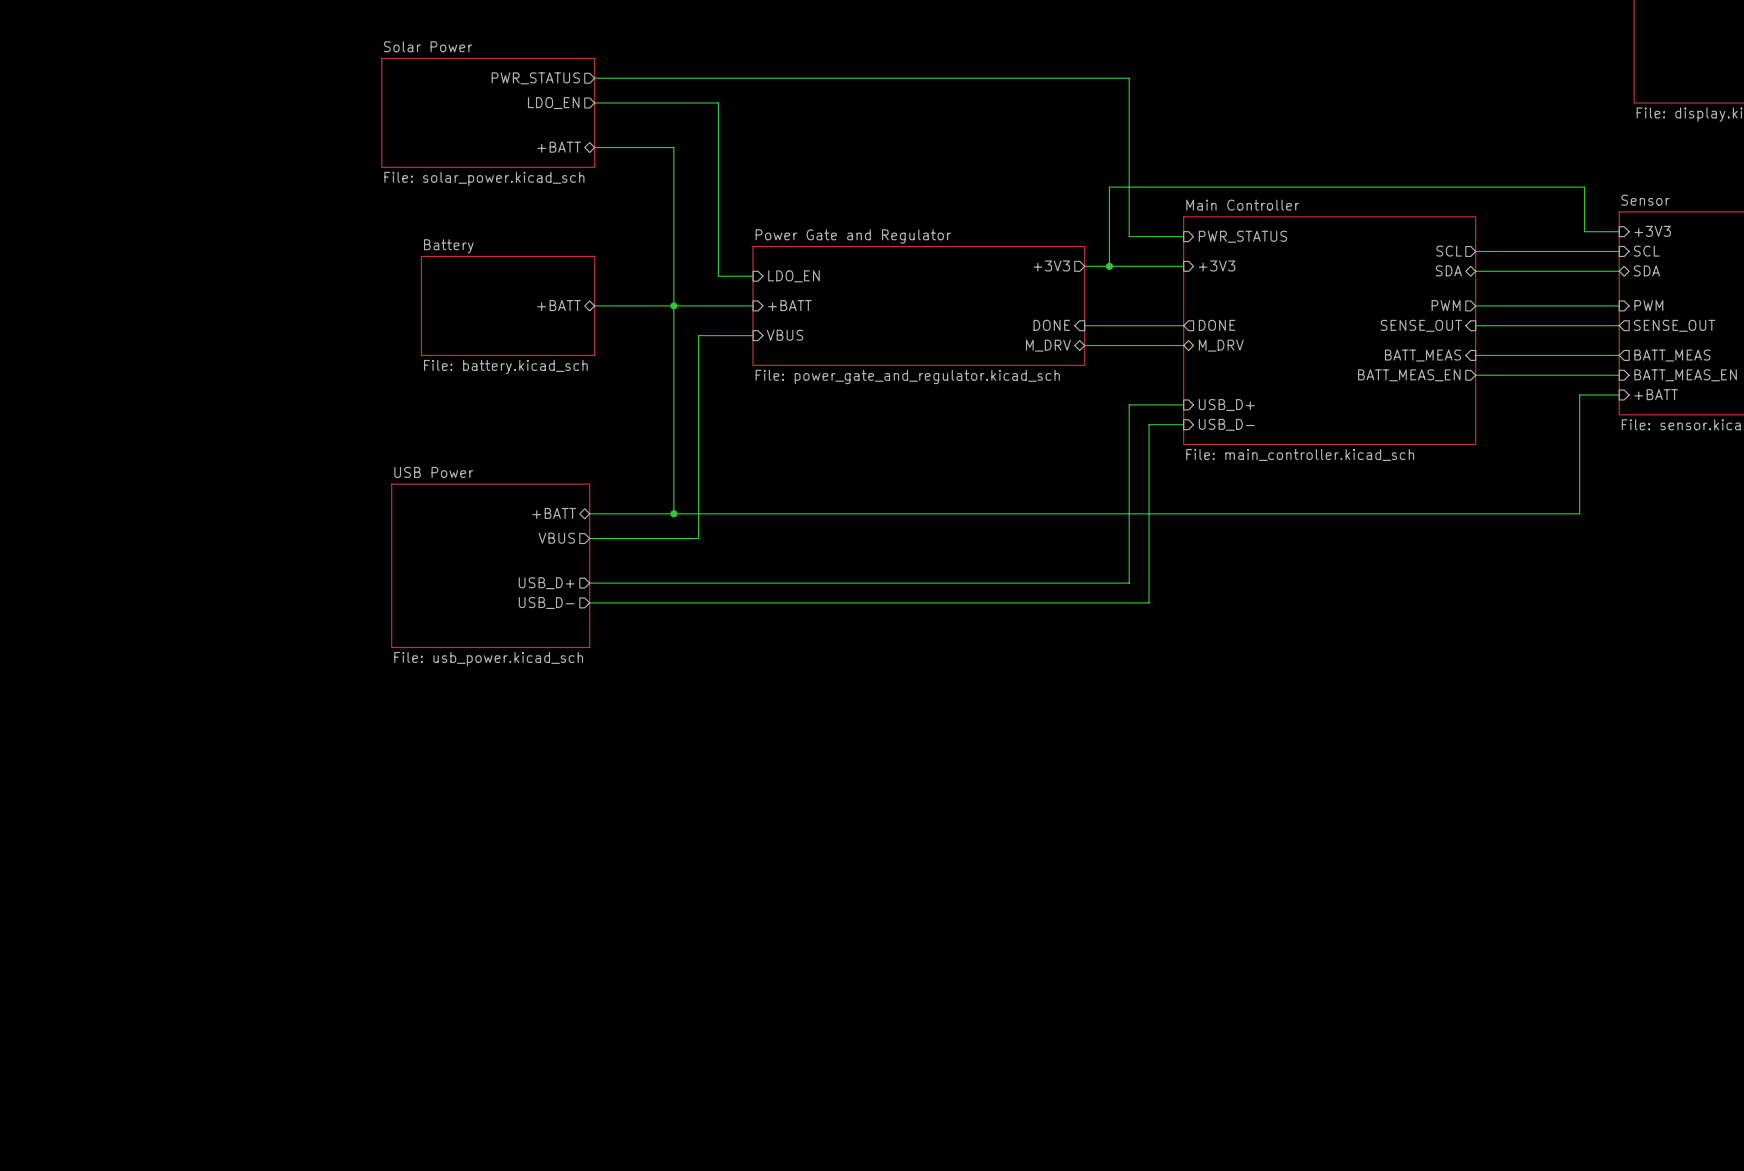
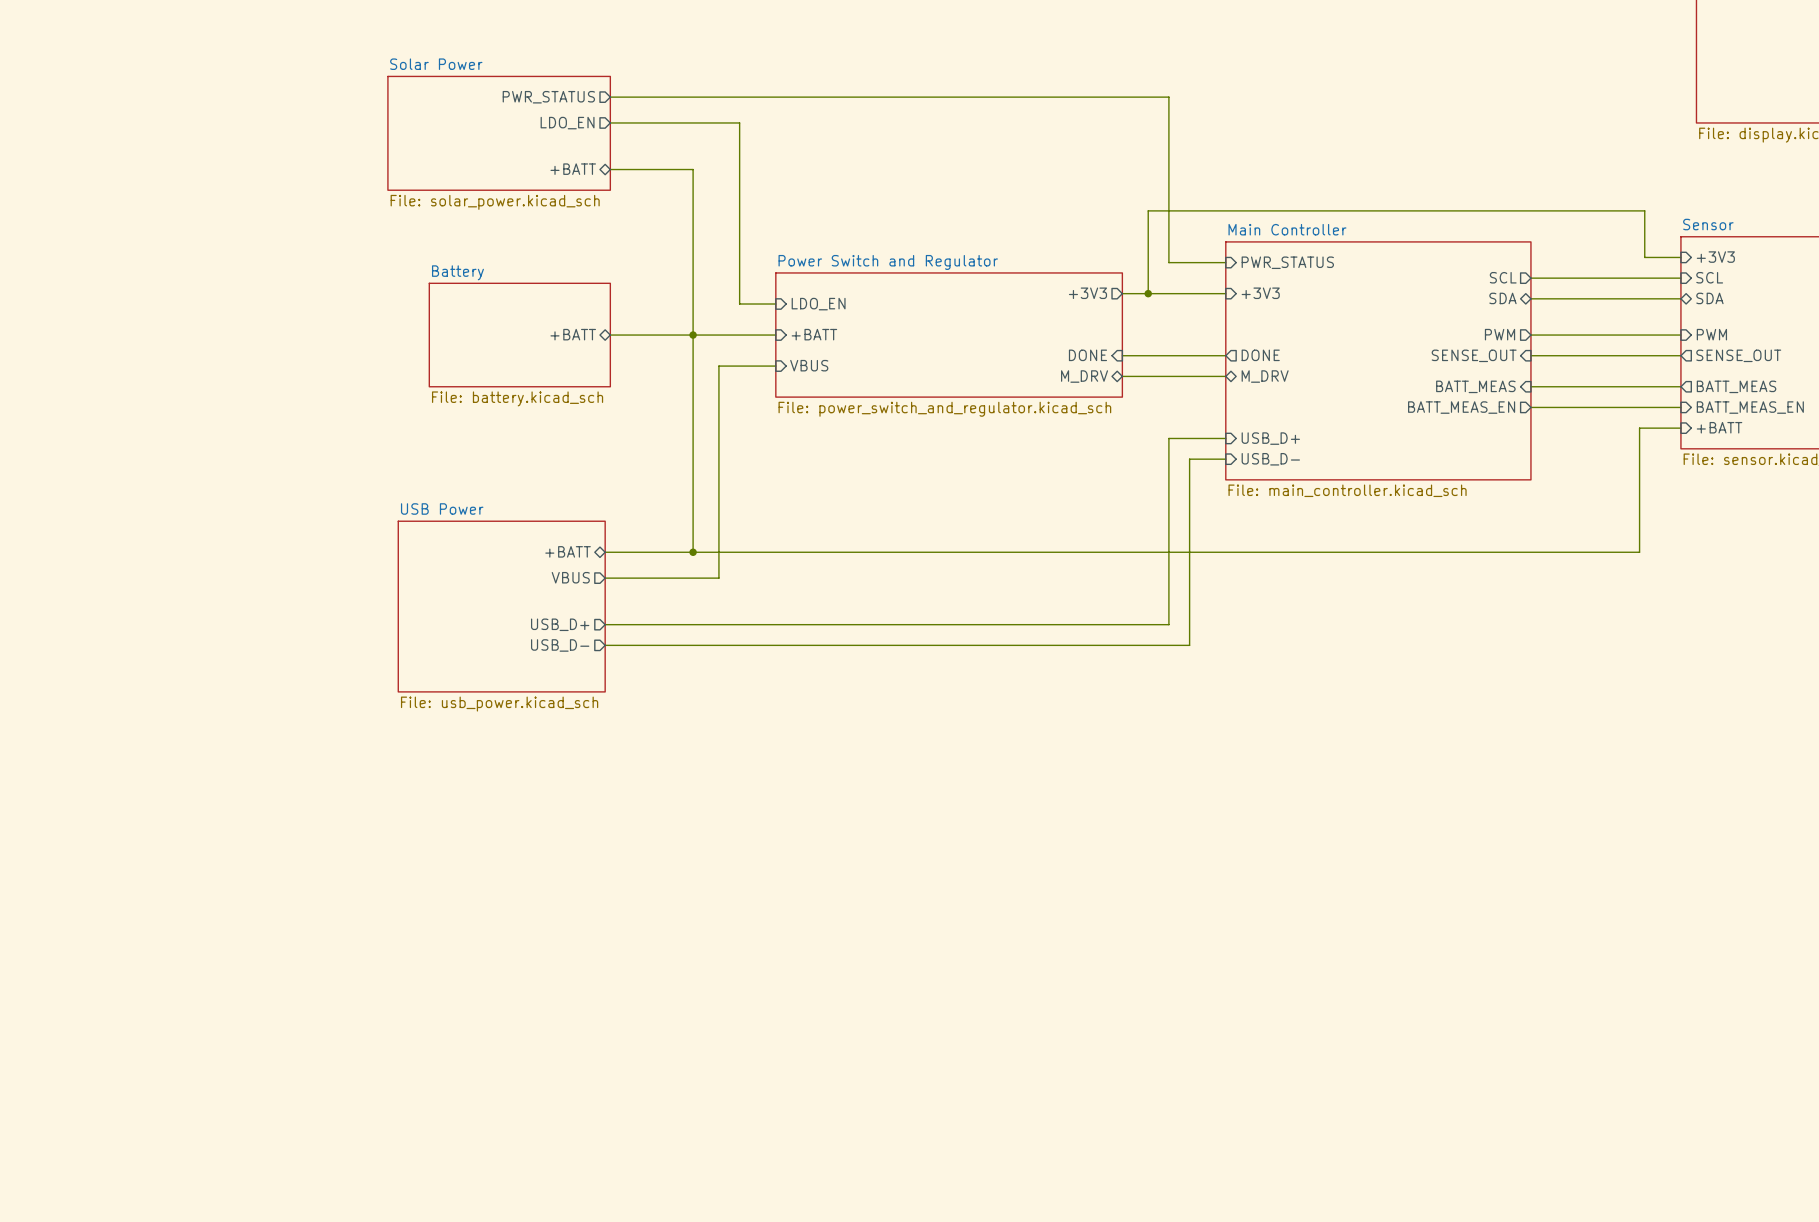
sheet Power Gate and Regulator name: Power Gate and Regulator (853, 236) -> Power Switch and Regulator (888, 262)
sheet Power Gate and Regulator value: File: power_gate_and_regulator.kicad_sch (907, 376) -> File: power_switch_and_regulator.kicad_sch (944, 409)

